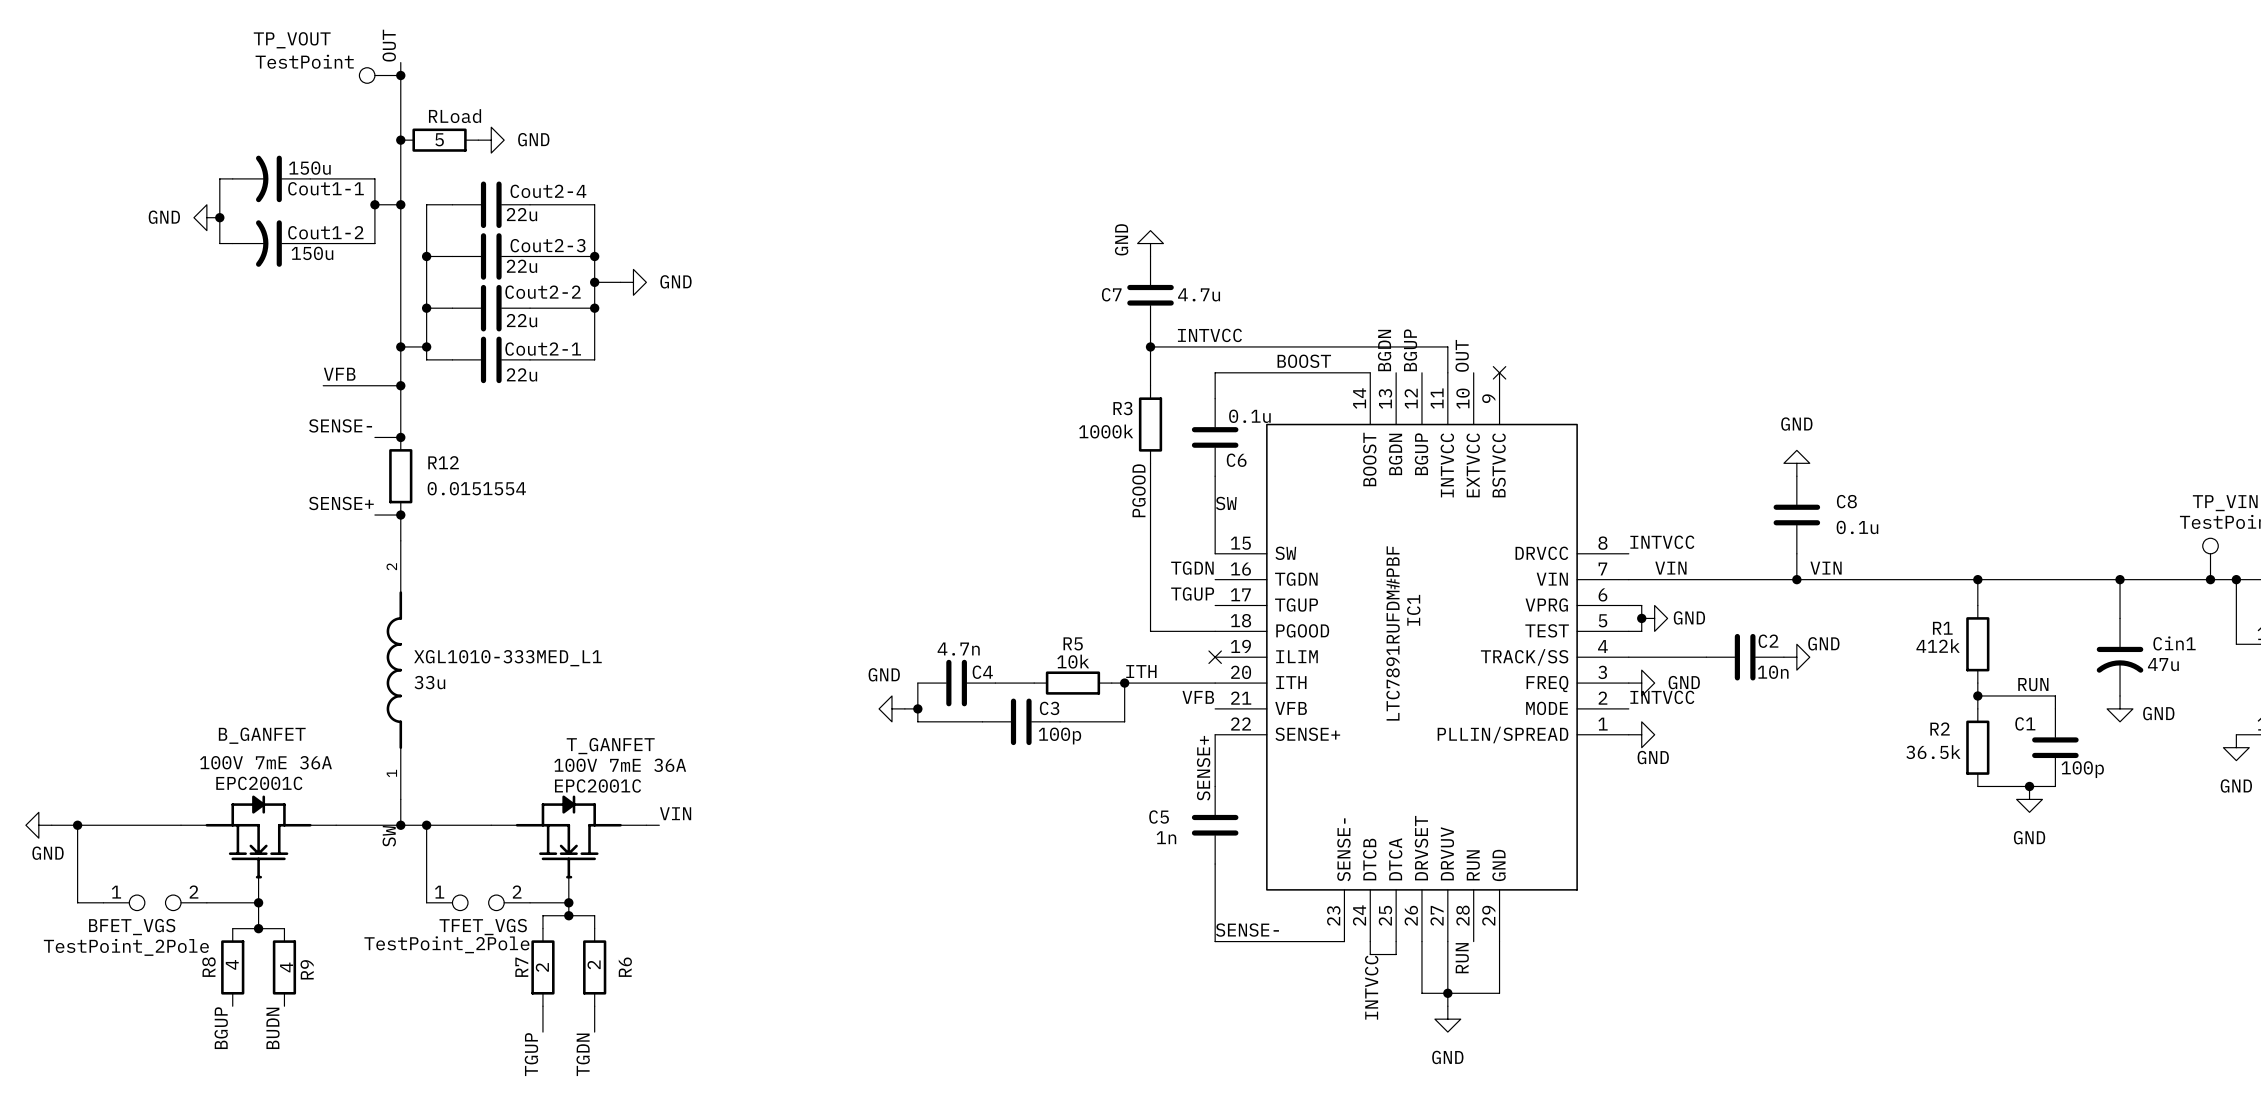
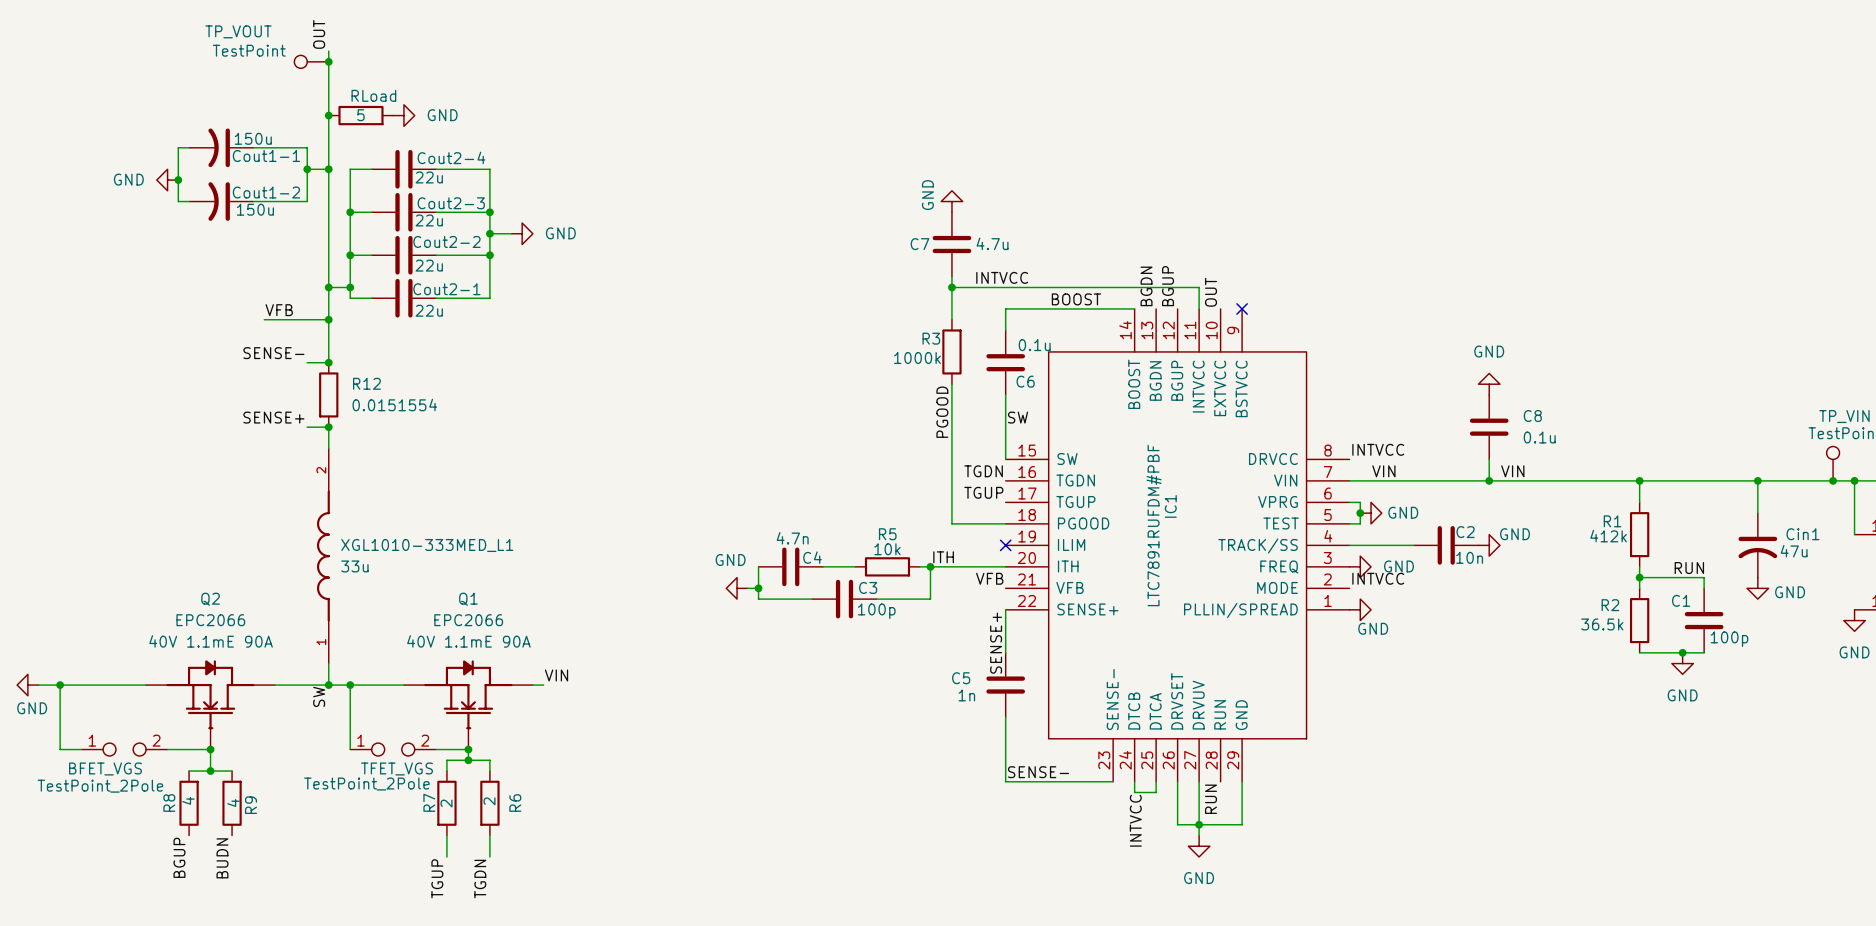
B_GANFET name: B_GANFET (262, 735) -> Q2 (210, 599)
T_GANFET name: T_GANFET (610, 746) -> Q1 (468, 599)
B_GANFET text: 100V 7mE 36A (266, 762) -> 40V 1.1mE 90A (211, 641)
T_GANFET text: 100V 7mE 36A (620, 765) -> 40V 1.1mE 90A (468, 641)
B_GANFET value: EPC2001C (259, 783) -> EPC2066 (210, 620)
T_GANFET value: EPC2001C (598, 785) -> EPC2066 (468, 620)

